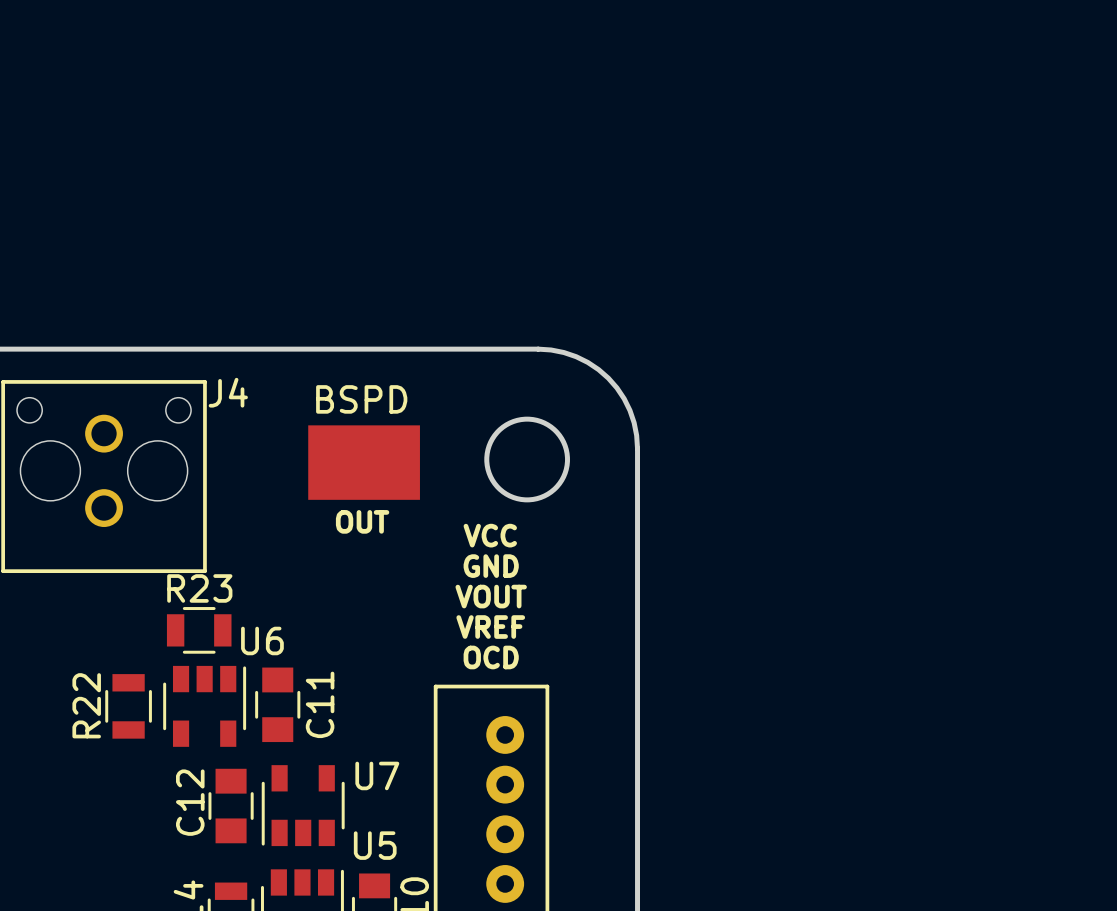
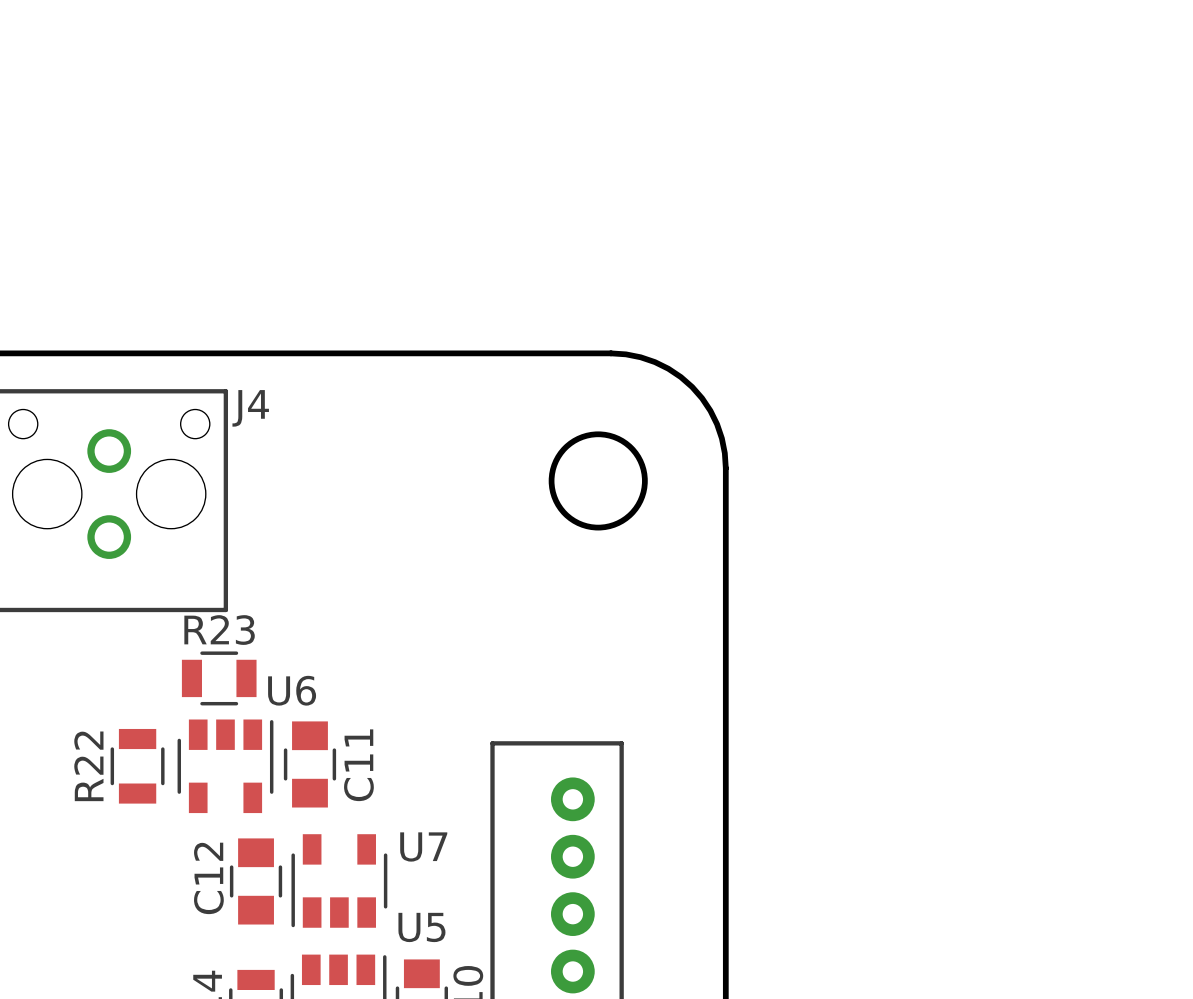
BSPD: (364, 462) -> none
text: OUT (362, 521) -> none
text: VCC (490, 535) -> none
text: GND (491, 566) -> none
text: VOUT (491, 596) -> none
text: VREF (490, 627) -> none
text: OCD (491, 657) -> none

